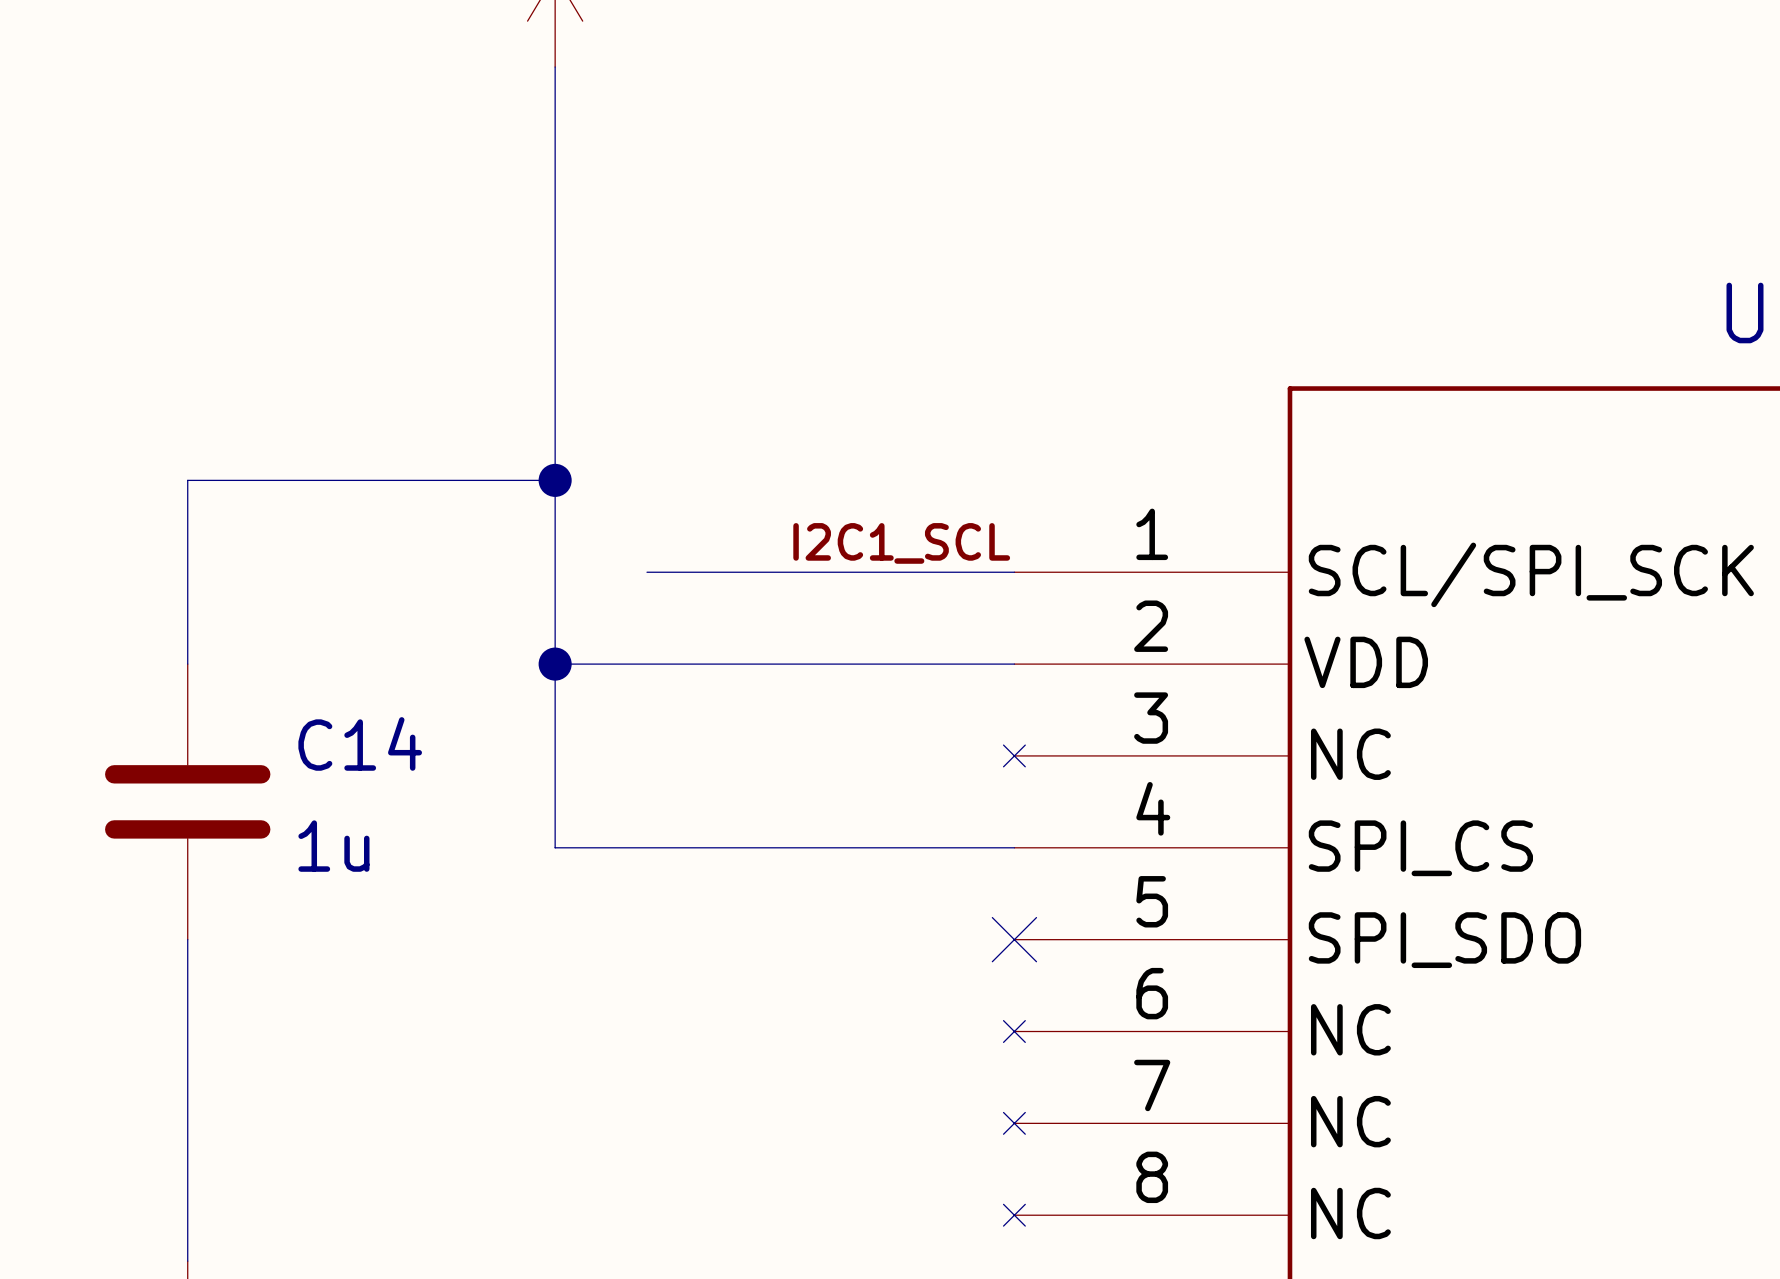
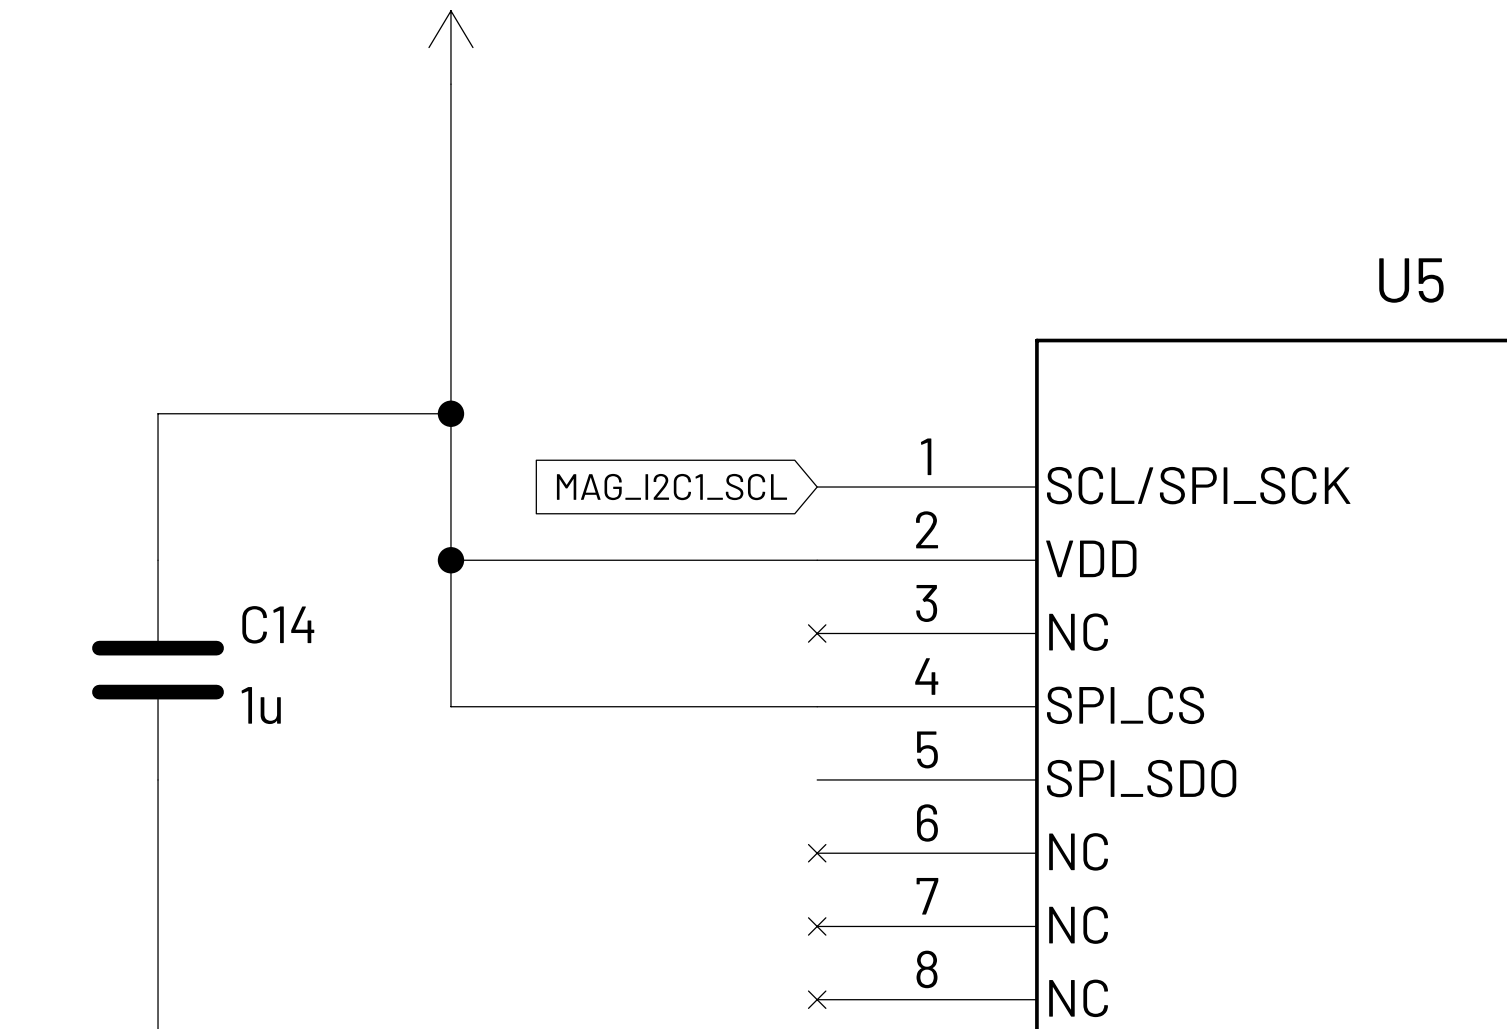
label: I2C1_SCL (901, 543) -> none
wire: (647, 572) (1014, 572) -> none
global label: none -> MAG_I2C1_SCL (671, 487)
no-connect mark: (1014, 939) -> none

